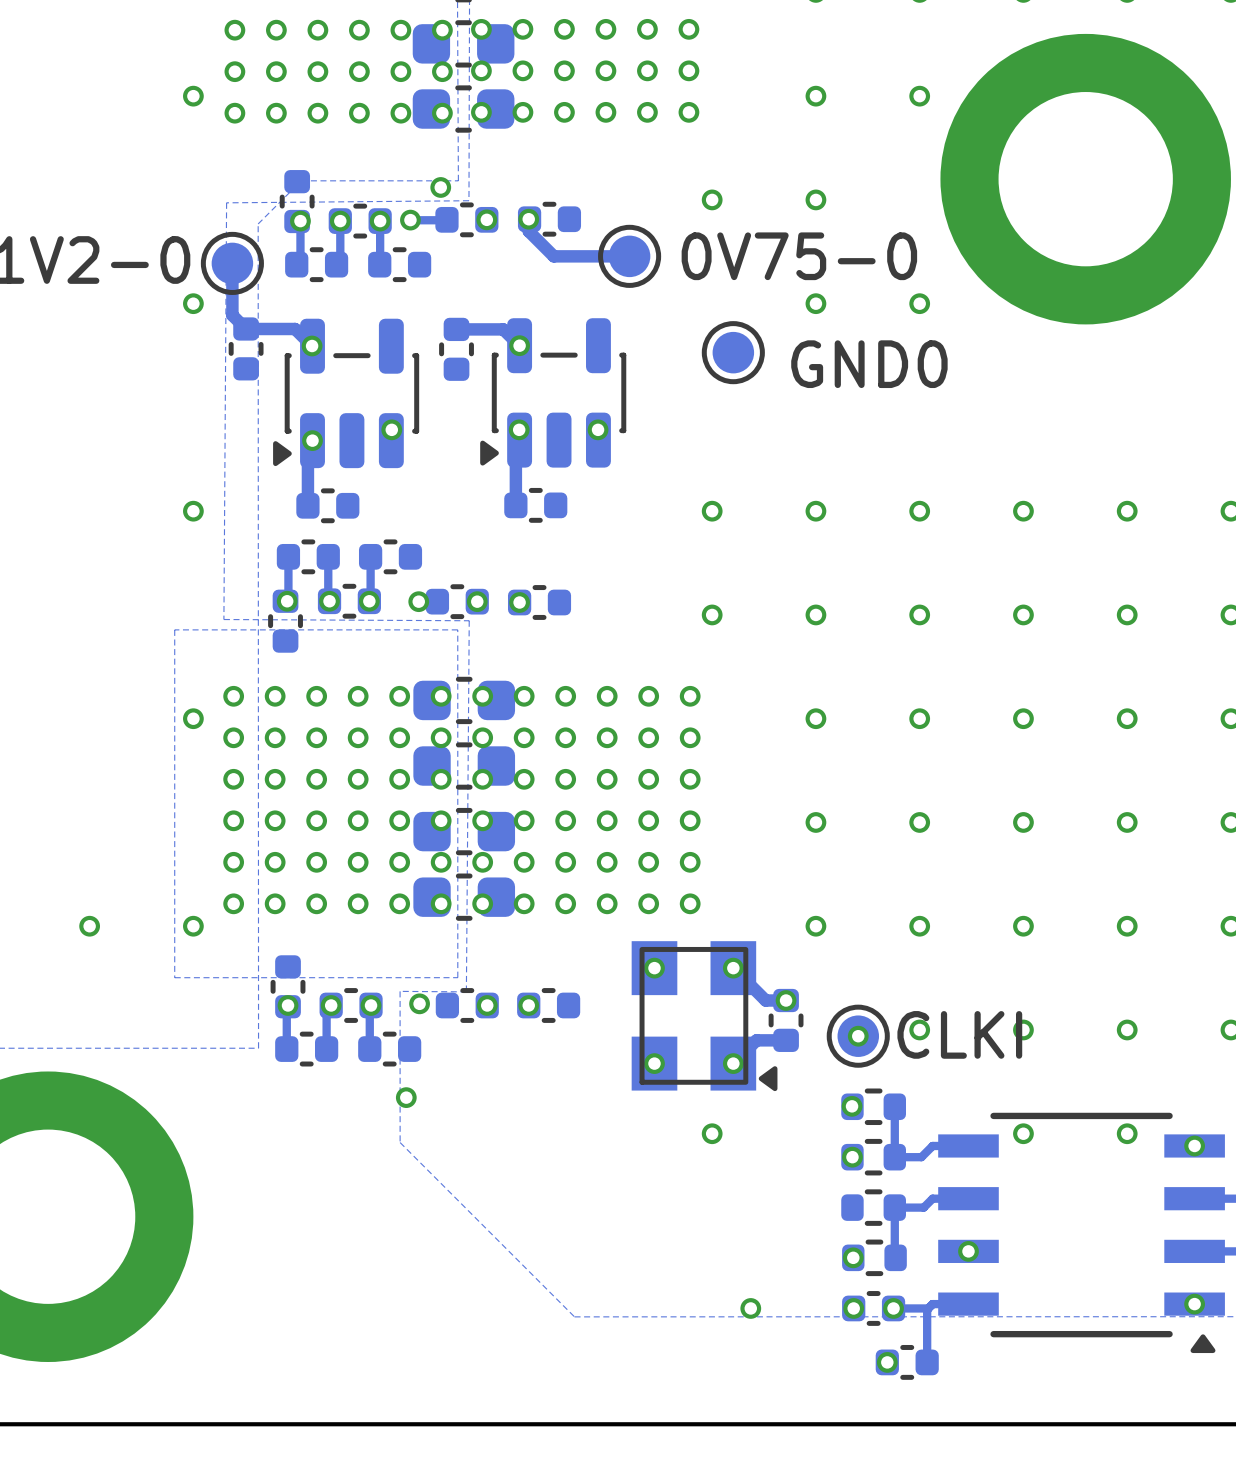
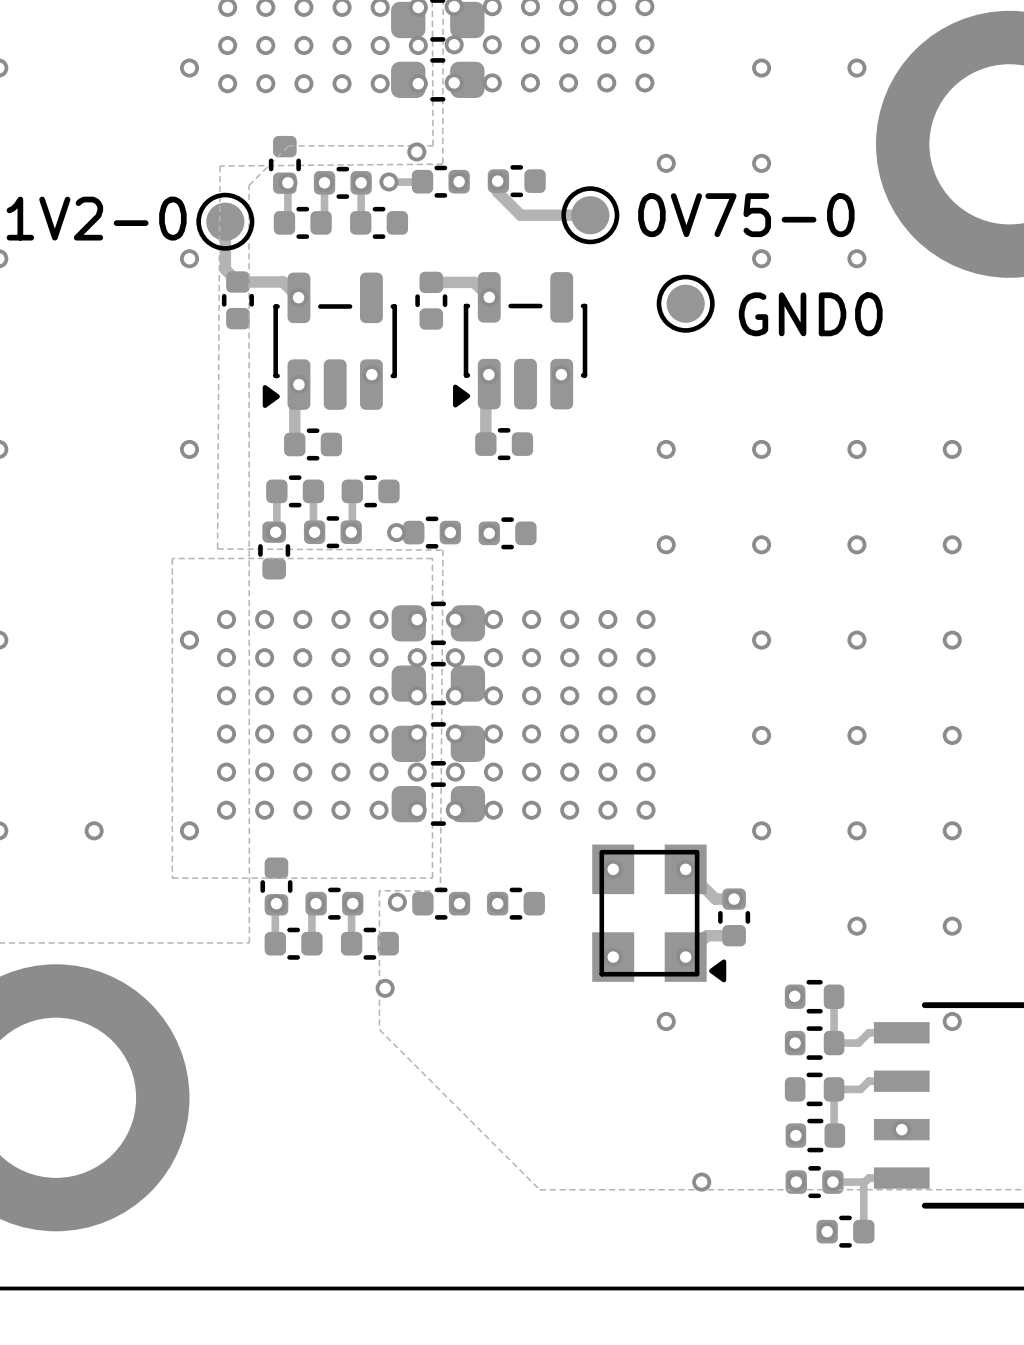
part: CLKI (858, 1036) -> none
via: (858, 1036) -> none

